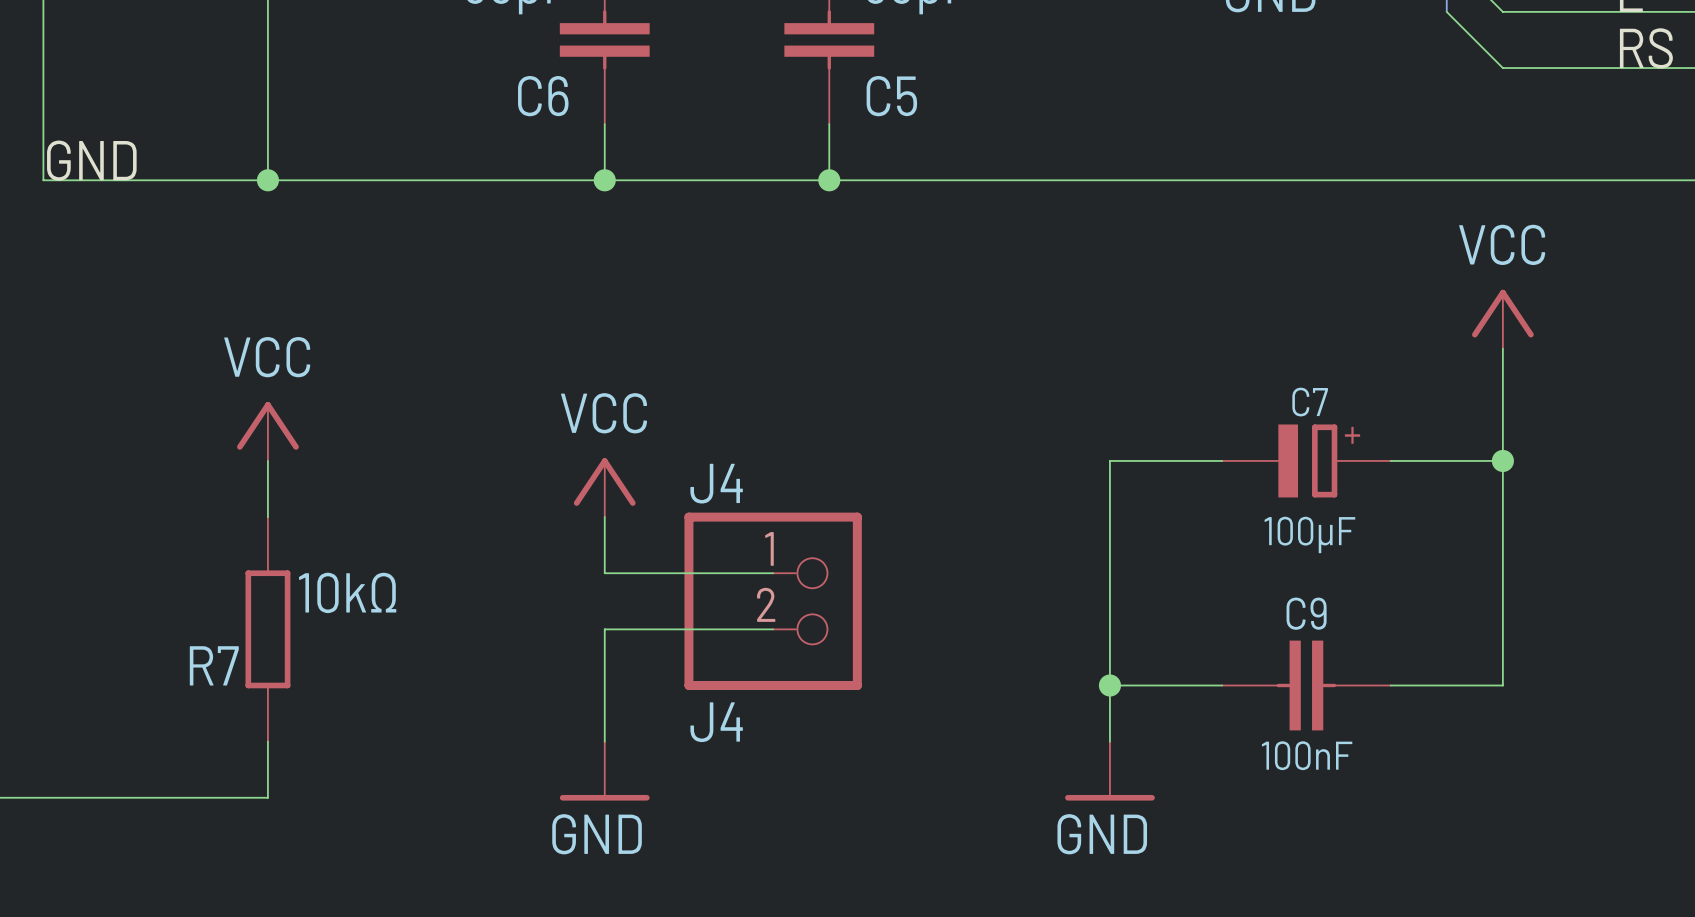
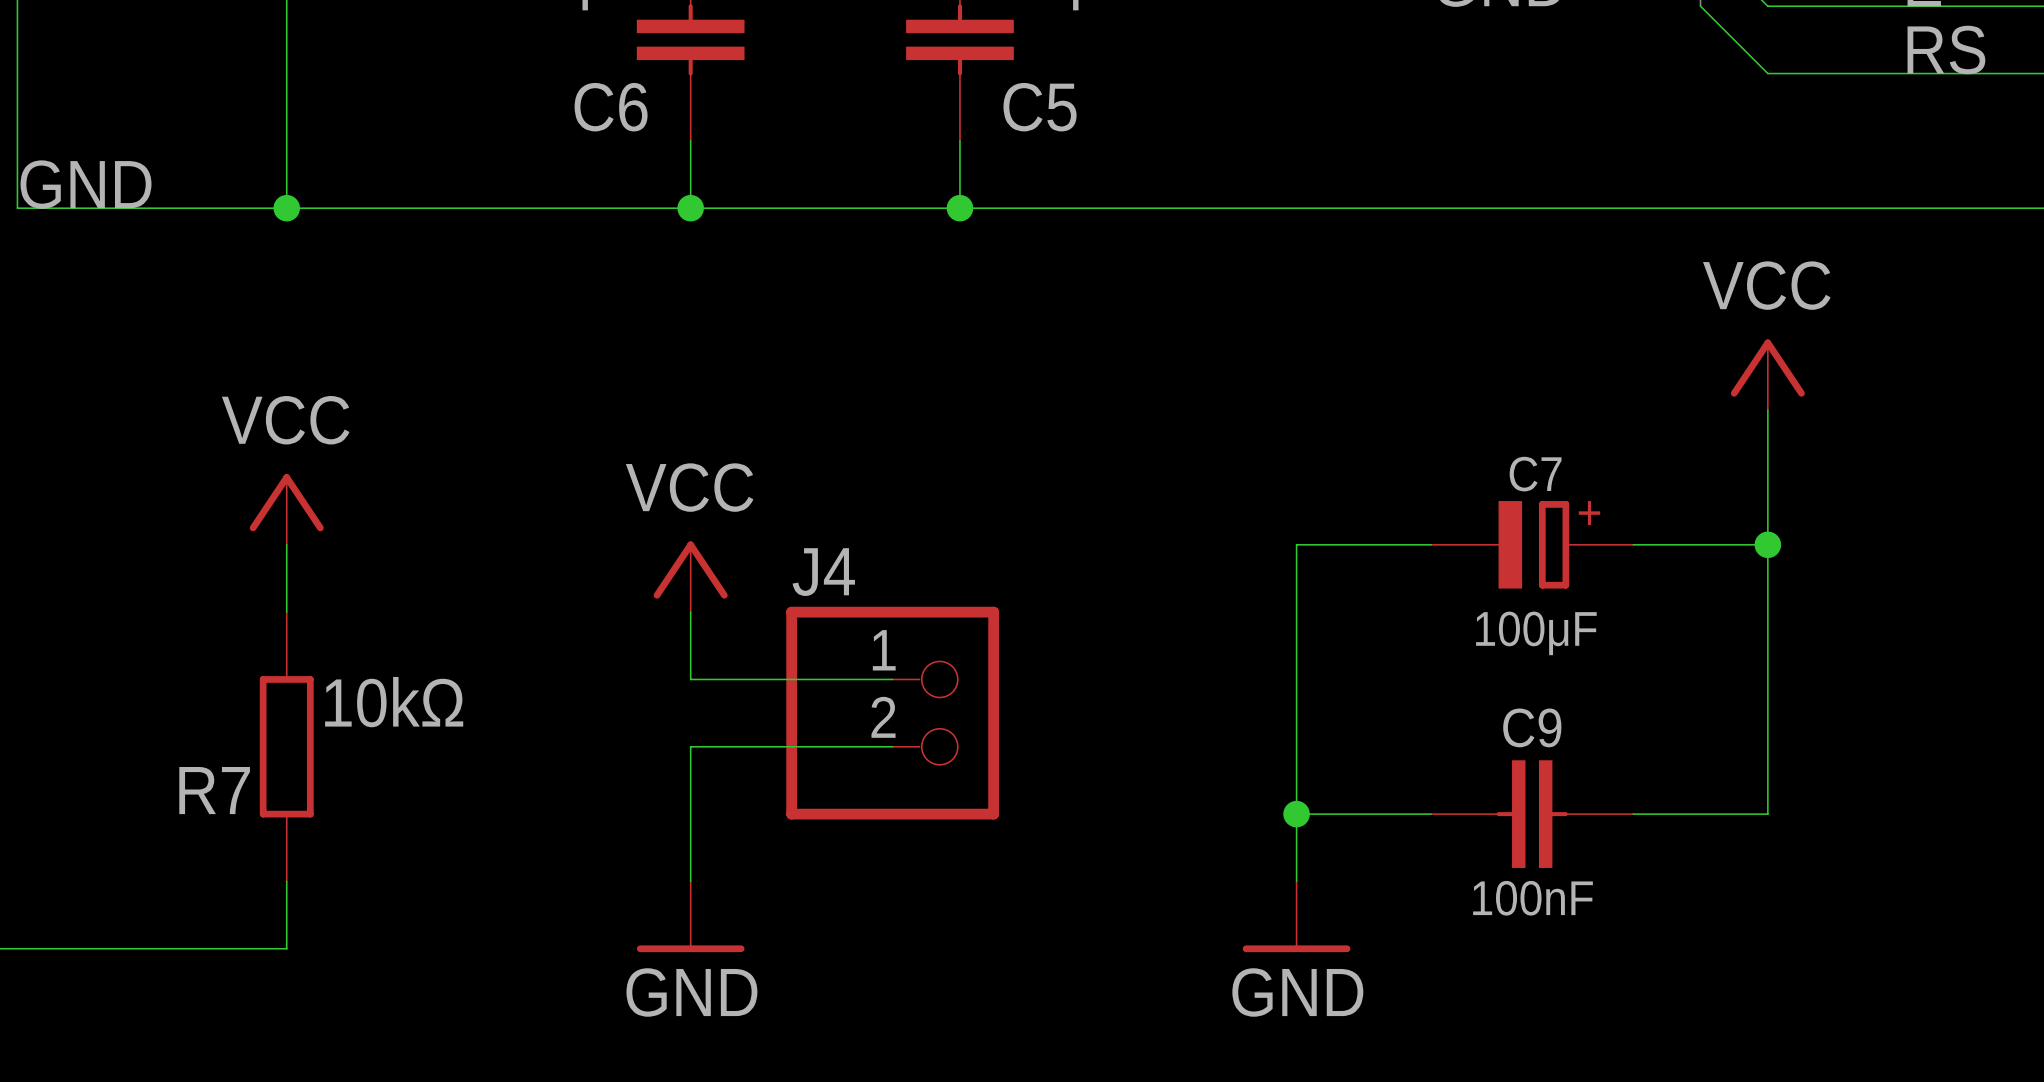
J4 value: J4 (716, 722) -> none

